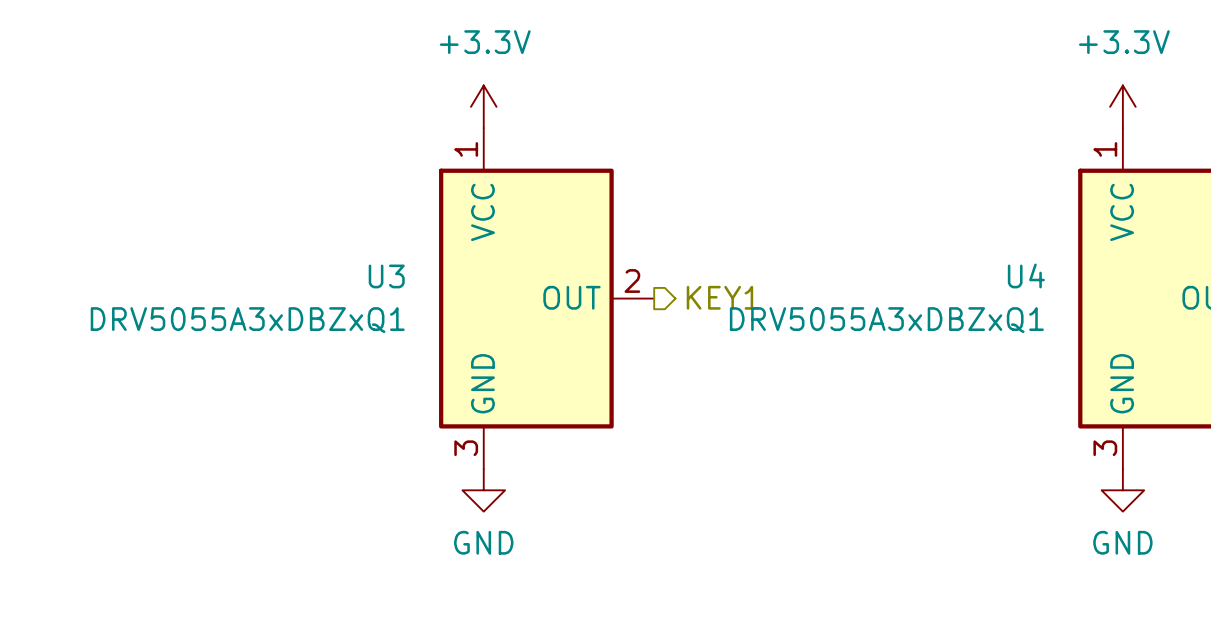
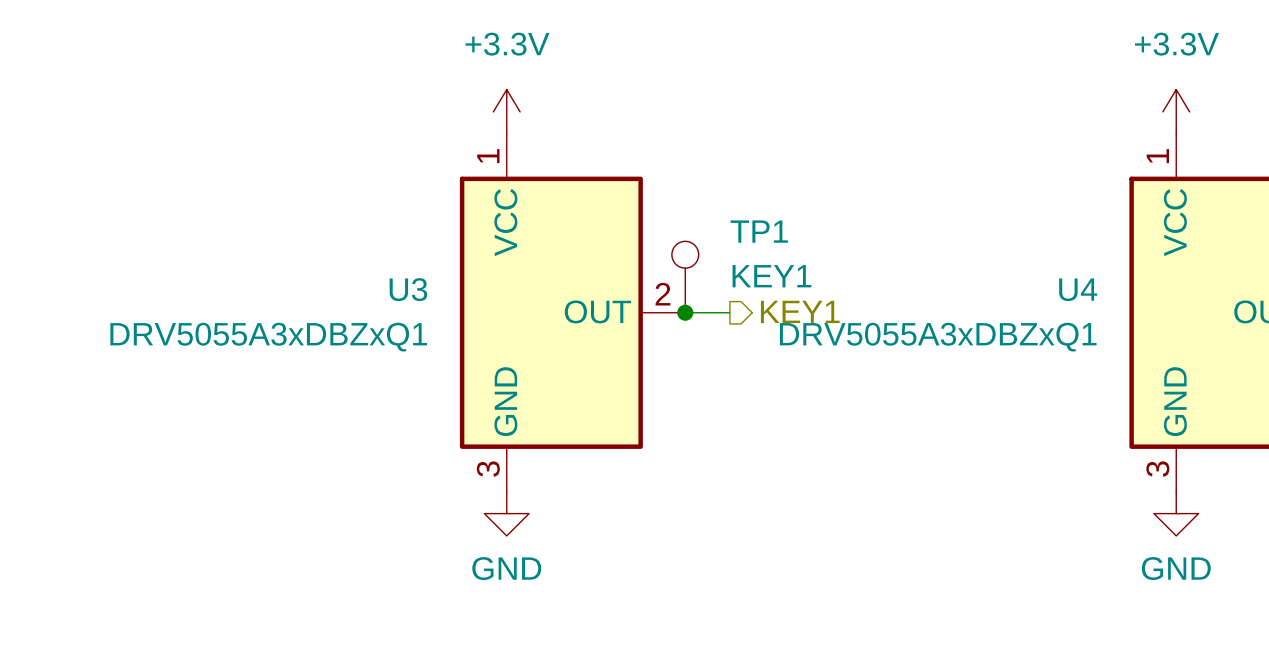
TP1: none -> KEY1 (685, 277)
hierarchical label position: KEY1 (723, 297) -> KEY1 (800, 311)
wire: none -> (685, 312) (729, 312)
junction: none -> (685, 312)

